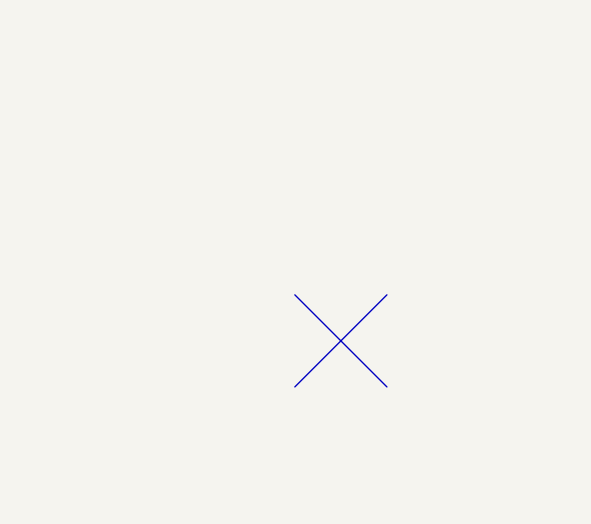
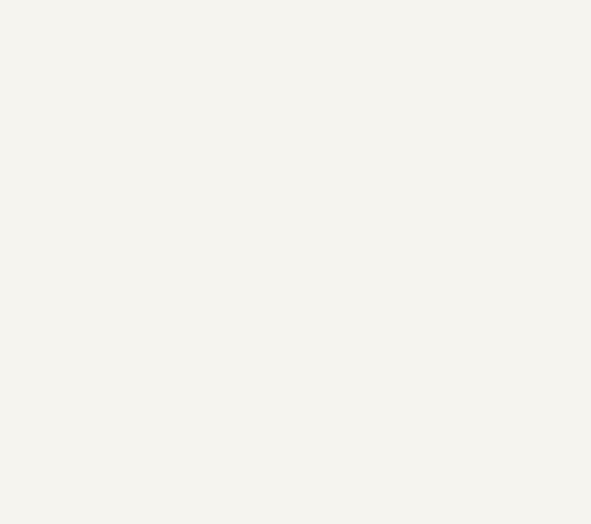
no-connect mark: (340, 340) -> none

